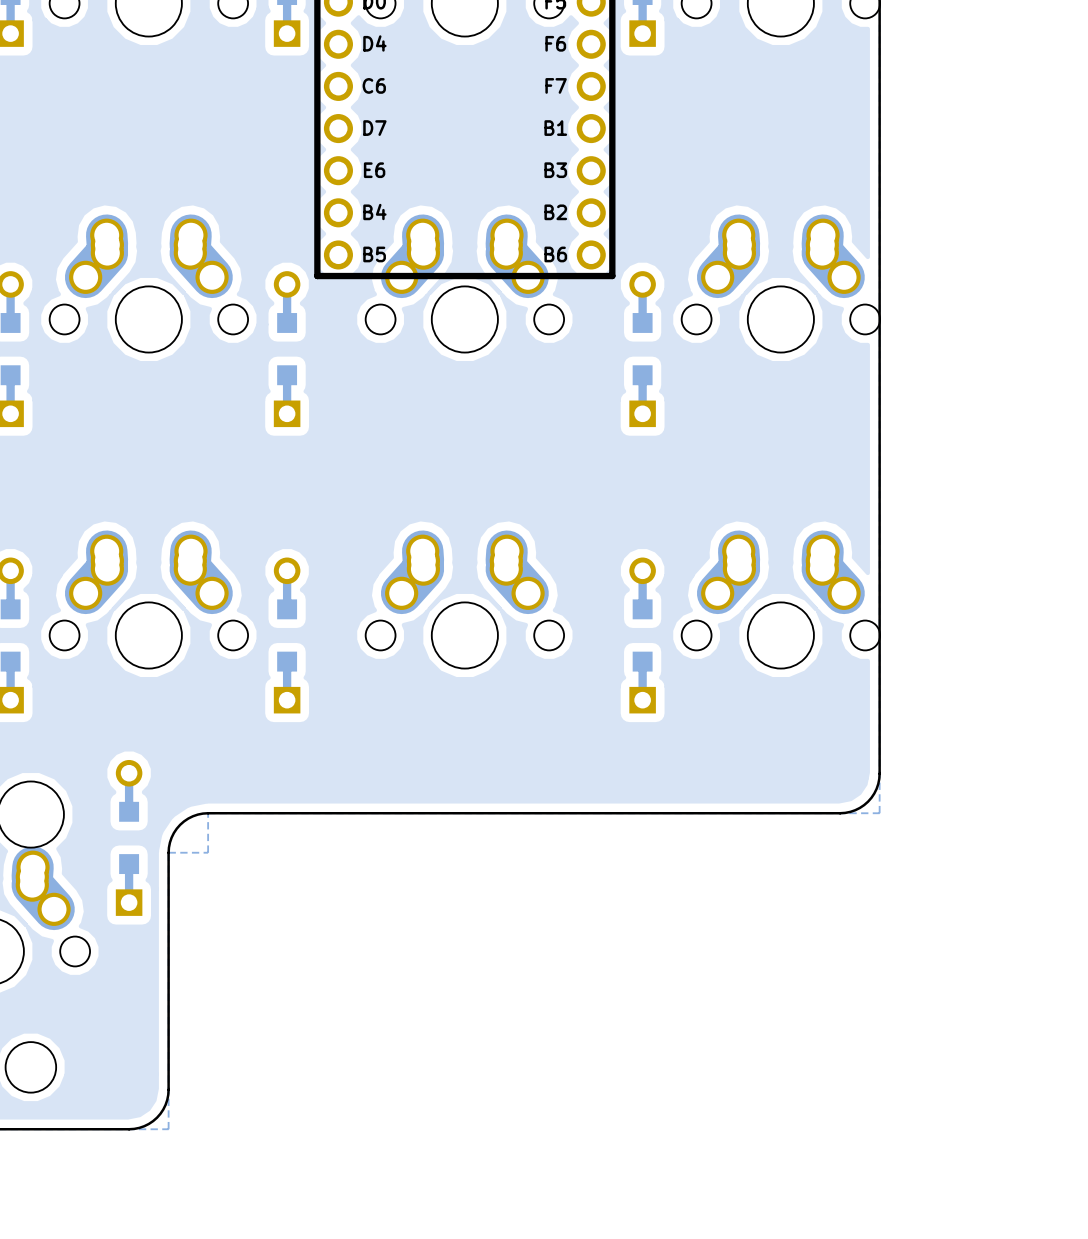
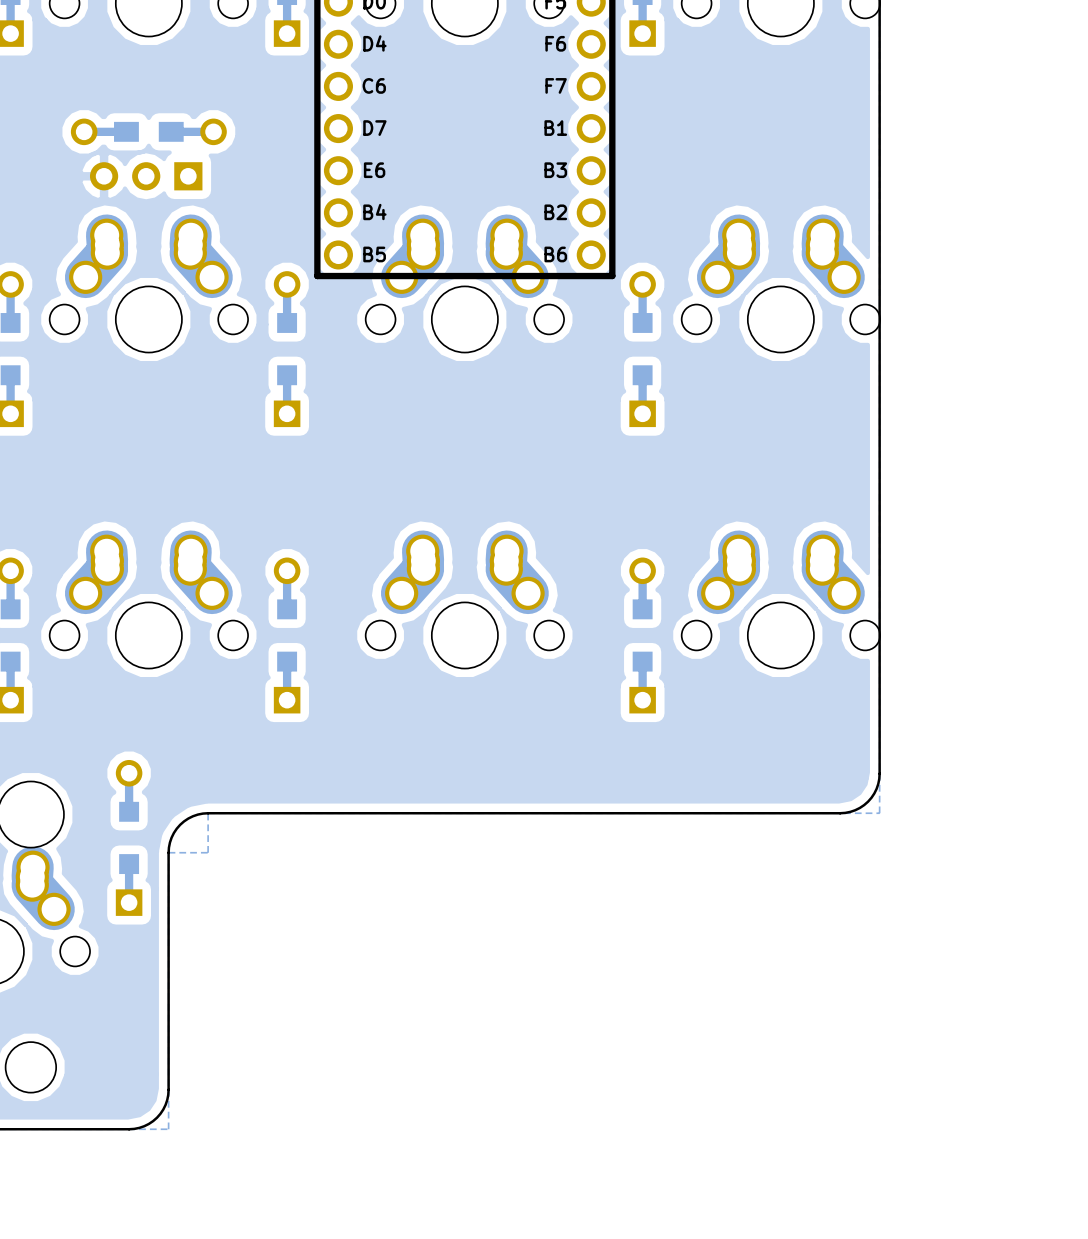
part: none -> (148, 131)
part: none -> (146, 176)

